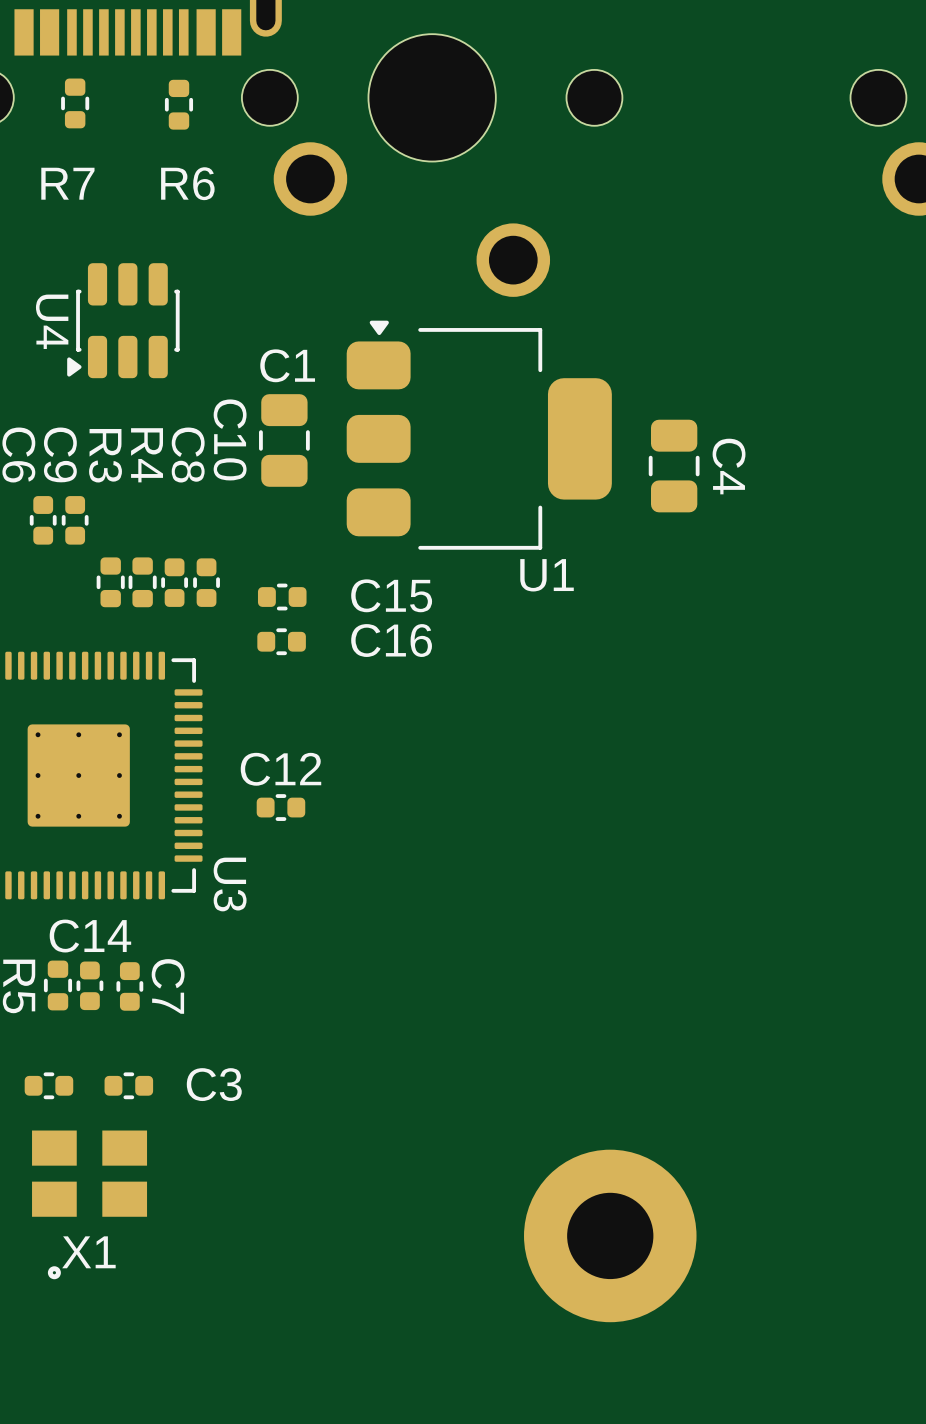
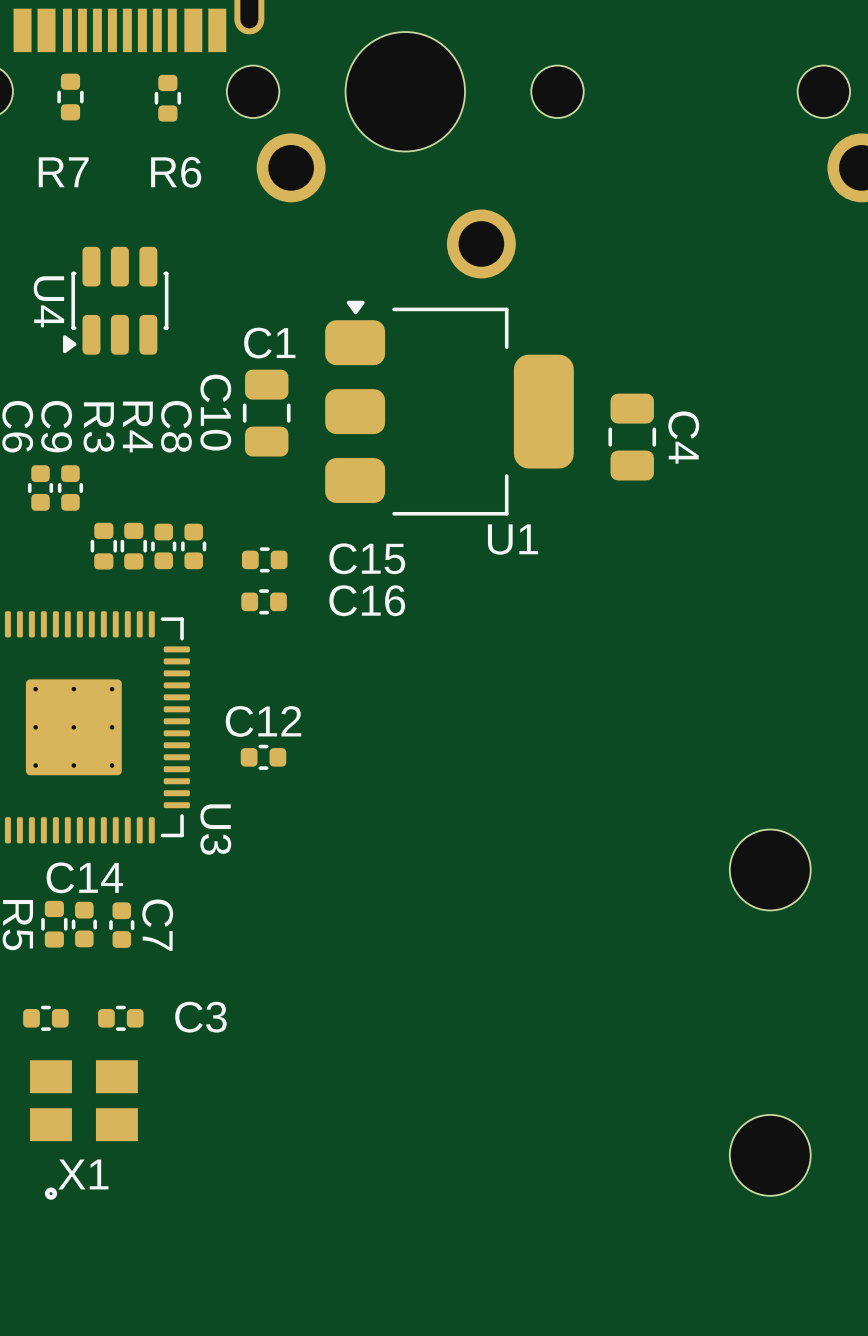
part: none -> (770, 870)
part: none -> (770, 1155)
part: (610, 1235) -> none

